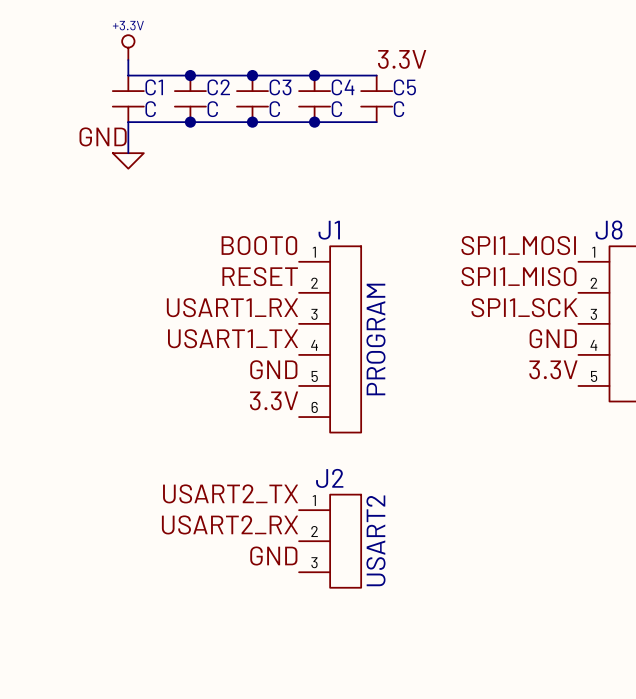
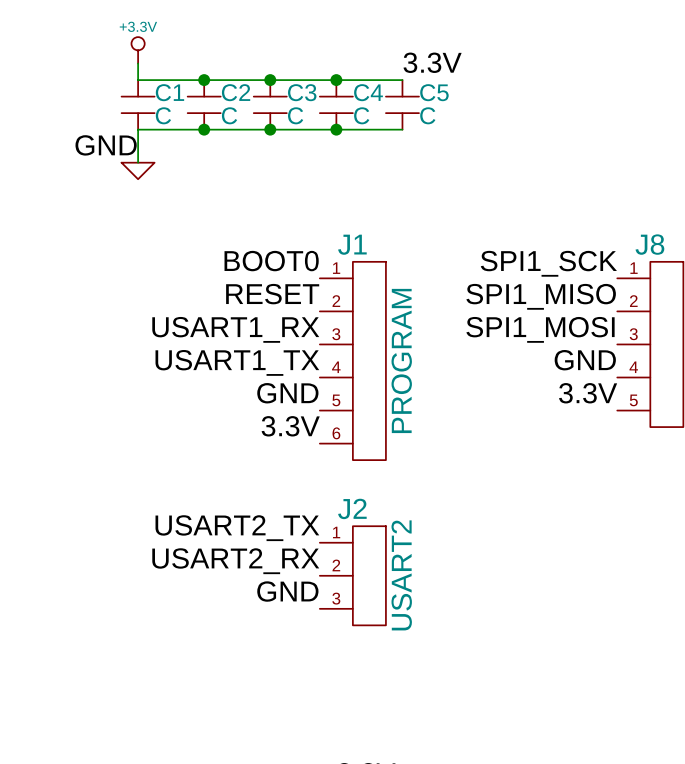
label: SPI1_MOSI (518, 245) -> SPI1_SCK (548, 263)
label: SPI1_SCK (524, 307) -> SPI1_MOSI (540, 329)

